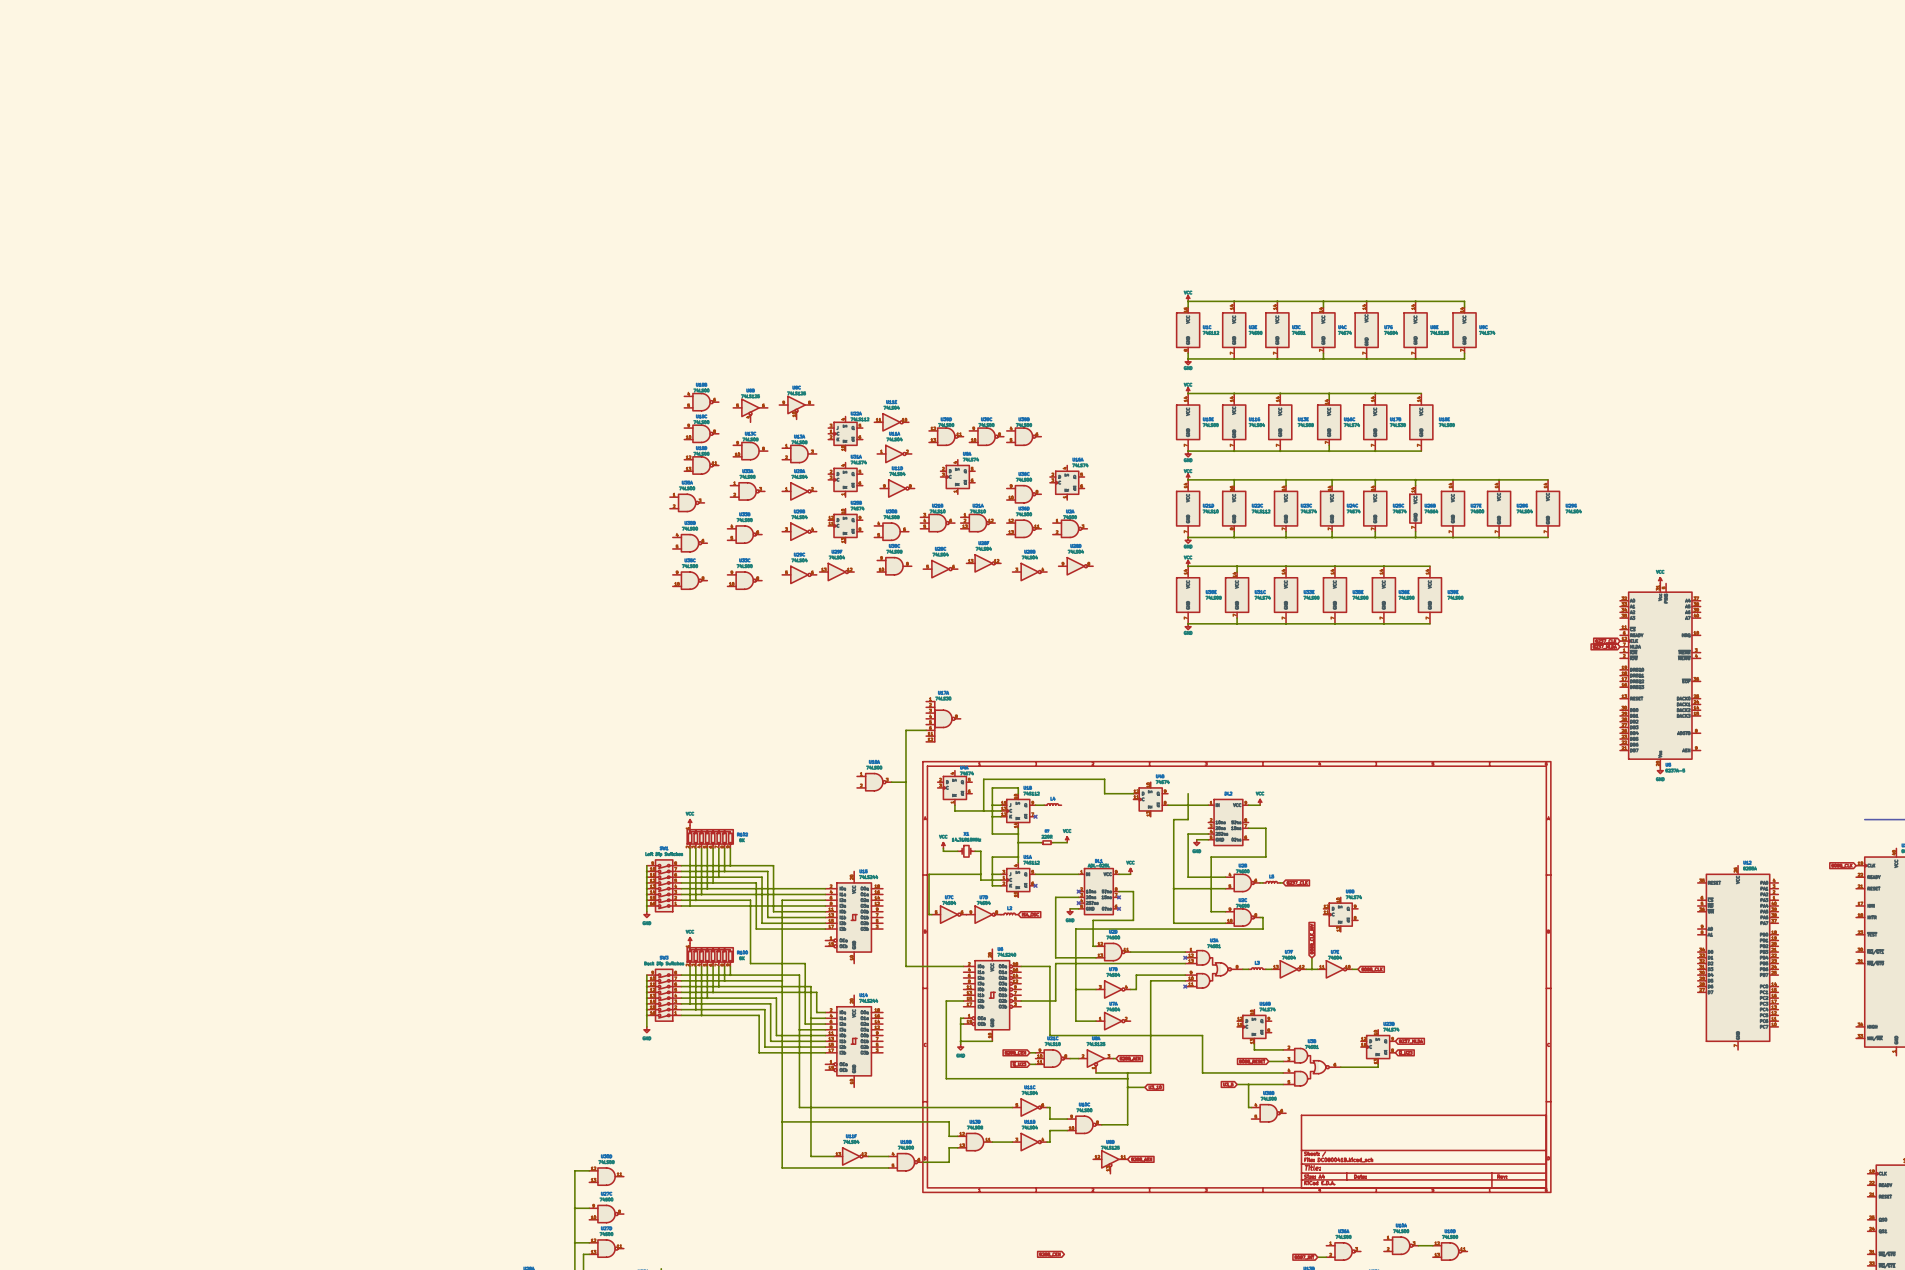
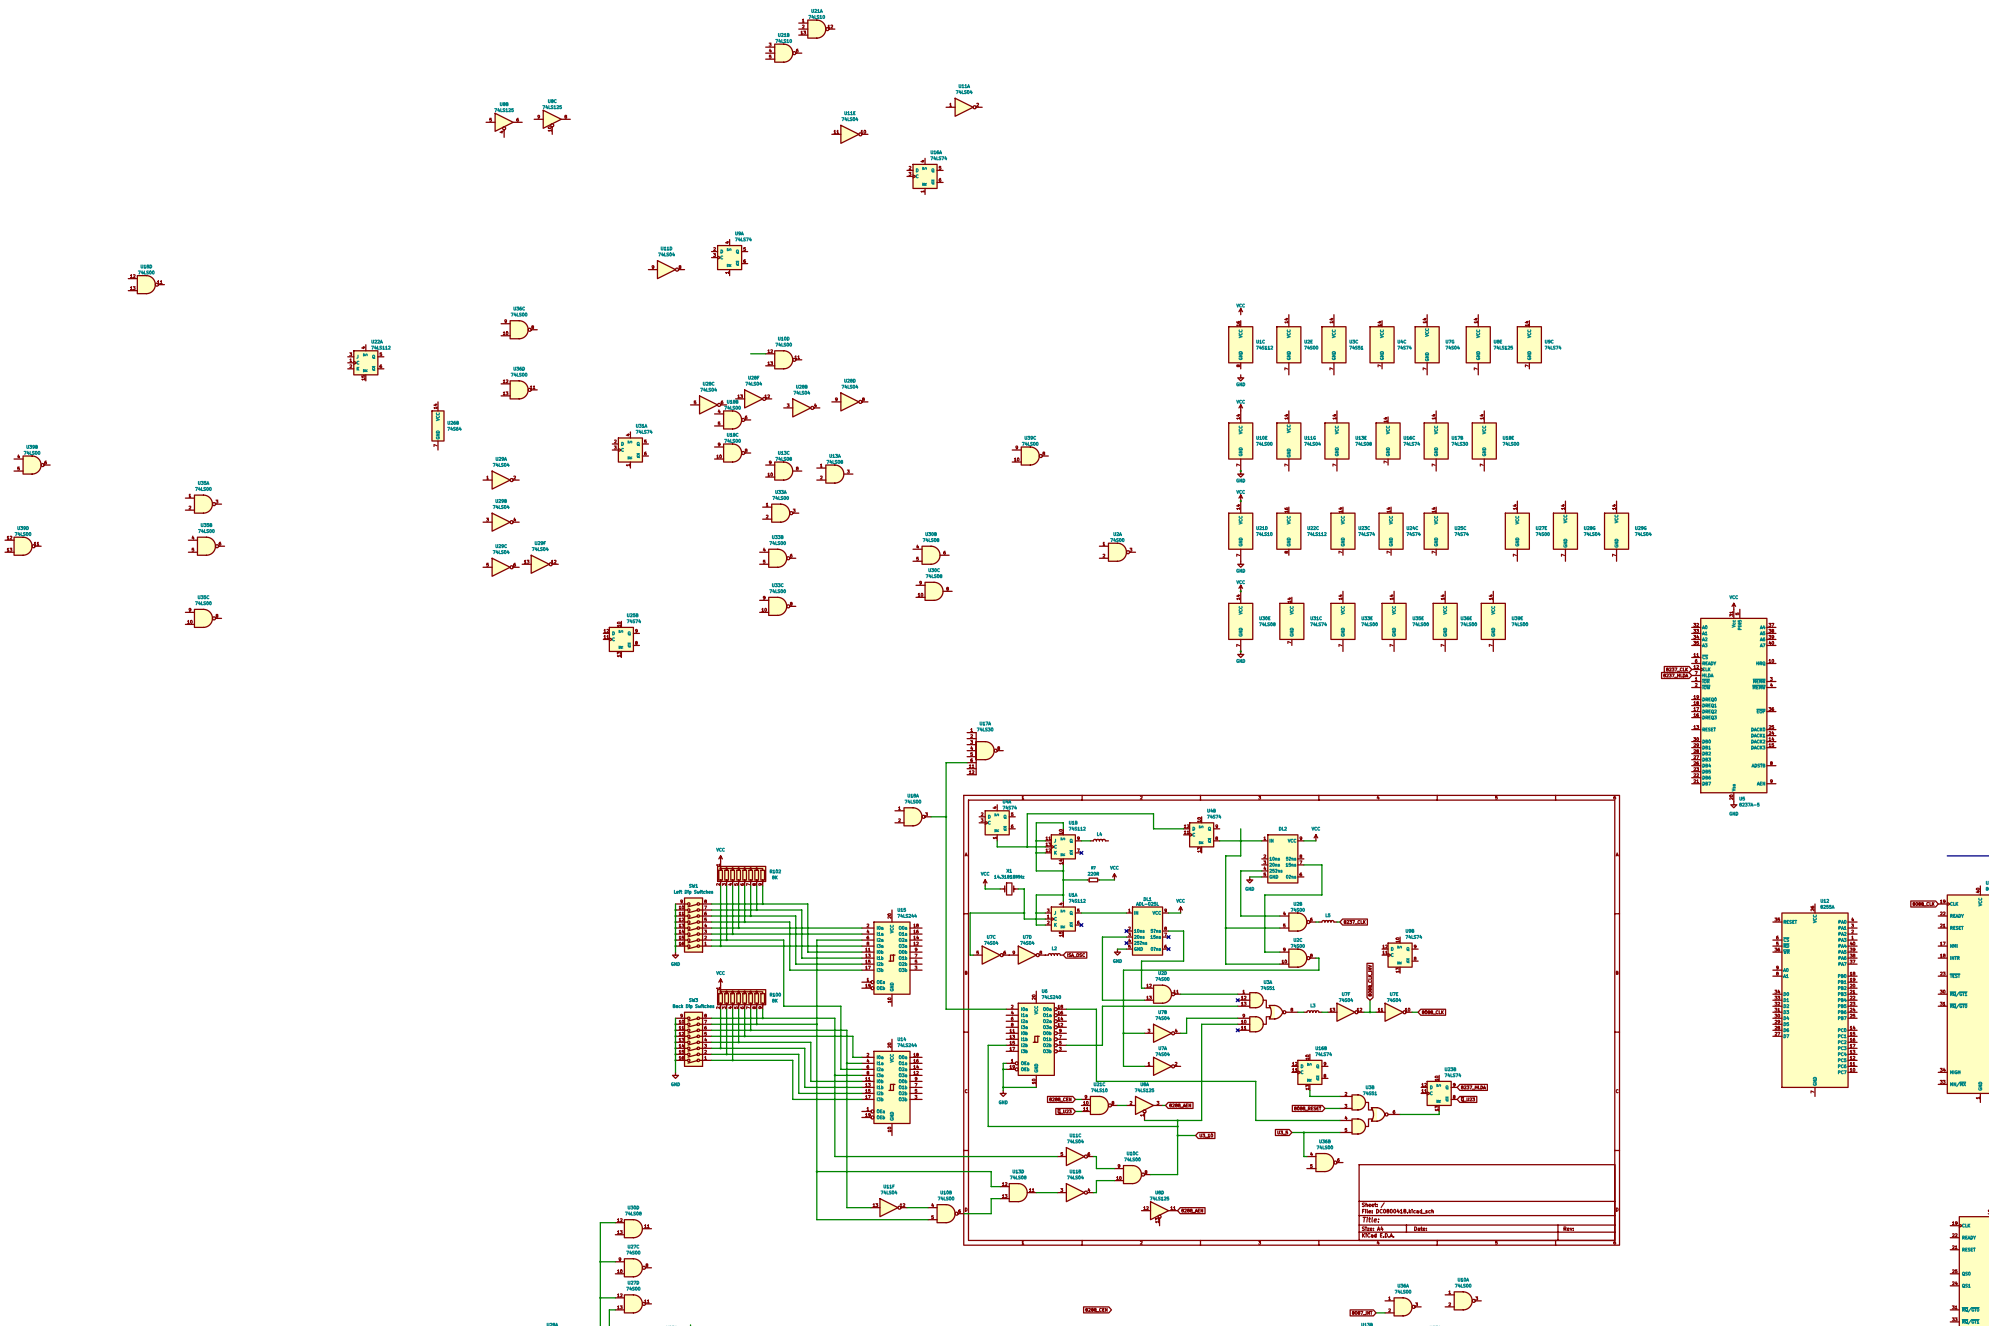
wire: (1323, 301) (1323, 307) -> none
wire: (1188, 307) (1188, 301) (1464, 301) (1464, 307) -> none
wire: none -> (750, 353) (765, 353)
wire: (1188, 353) (1188, 358) (1464, 358) (1464, 353) -> none
wire: (1323, 353) (1323, 358) -> none
wire: (1188, 393) (1421, 393) -> none
wire: (1329, 393) (1329, 399) -> none
part position: (796, 407) -> (552, 122)
part position: (750, 410) -> (504, 125)
part position: (891, 422) -> (849, 134)
part position: (845, 433) -> (365, 362)
part position: (946, 436) -> (23, 546)
part position: (1024, 436) -> (32, 465)
wire: (1329, 445) (1329, 451) -> none
wire: (1188, 451) (1421, 451) -> none
part position: (894, 453) -> (964, 107)
part position: (701, 465) -> (146, 284)
part position: (957, 477) -> (729, 257)
part position: (845, 479) -> (630, 450)
wire: (1188, 479) (1548, 479) -> none
wire: (1234, 479) (1234, 485) -> none
wire: (1286, 479) (1286, 485) -> none
wire: (1332, 479) (1332, 485) -> none
wire: (1375, 479) (1375, 485) -> none
wire: (1415, 479) (1415, 485) -> none
part position: (1067, 482) -> (925, 176)
part position: (897, 488) -> (666, 269)
part position: (799, 491) -> (501, 480)
part position: (1024, 494) -> (519, 329)
part position: (687, 502) -> (203, 504)
part position: (1415, 508) -> (437, 425)
part position: (937, 523) -> (783, 53)
part position: (977, 523) -> (816, 29)
part position: (845, 525) -> (621, 639)
part position: (1024, 528) -> (519, 389)
part position: (799, 531) -> (501, 522)
wire: (1234, 531) (1234, 537) -> none
wire: (1286, 531) (1286, 537) -> none
wire: (1332, 531) (1332, 537) -> none
wire: (1375, 531) (1375, 537) -> none
wire: (1415, 531) (1415, 537) -> none
wire: (1188, 537) (1548, 537) -> none
part position: (690, 543) -> (206, 546)
part position: (983, 563) -> (753, 398)
part position: (1075, 566) -> (849, 401)
wire: (1188, 566) (1429, 566) -> none
wire: (1237, 566) (1237, 572) -> none
part position: (940, 569) -> (708, 404)
part position: (836, 572) -> (540, 564)
part position: (1029, 572) -> (801, 407)
part position: (799, 574) -> (501, 567)
part position: (690, 580) -> (203, 618)
wire: (1237, 618) (1237, 623) -> none
wire: (1188, 623) (1429, 623) -> none
wire: (1418, 1245) (1432, 1245) -> none
part position: (1450, 1251) -> (783, 359)

